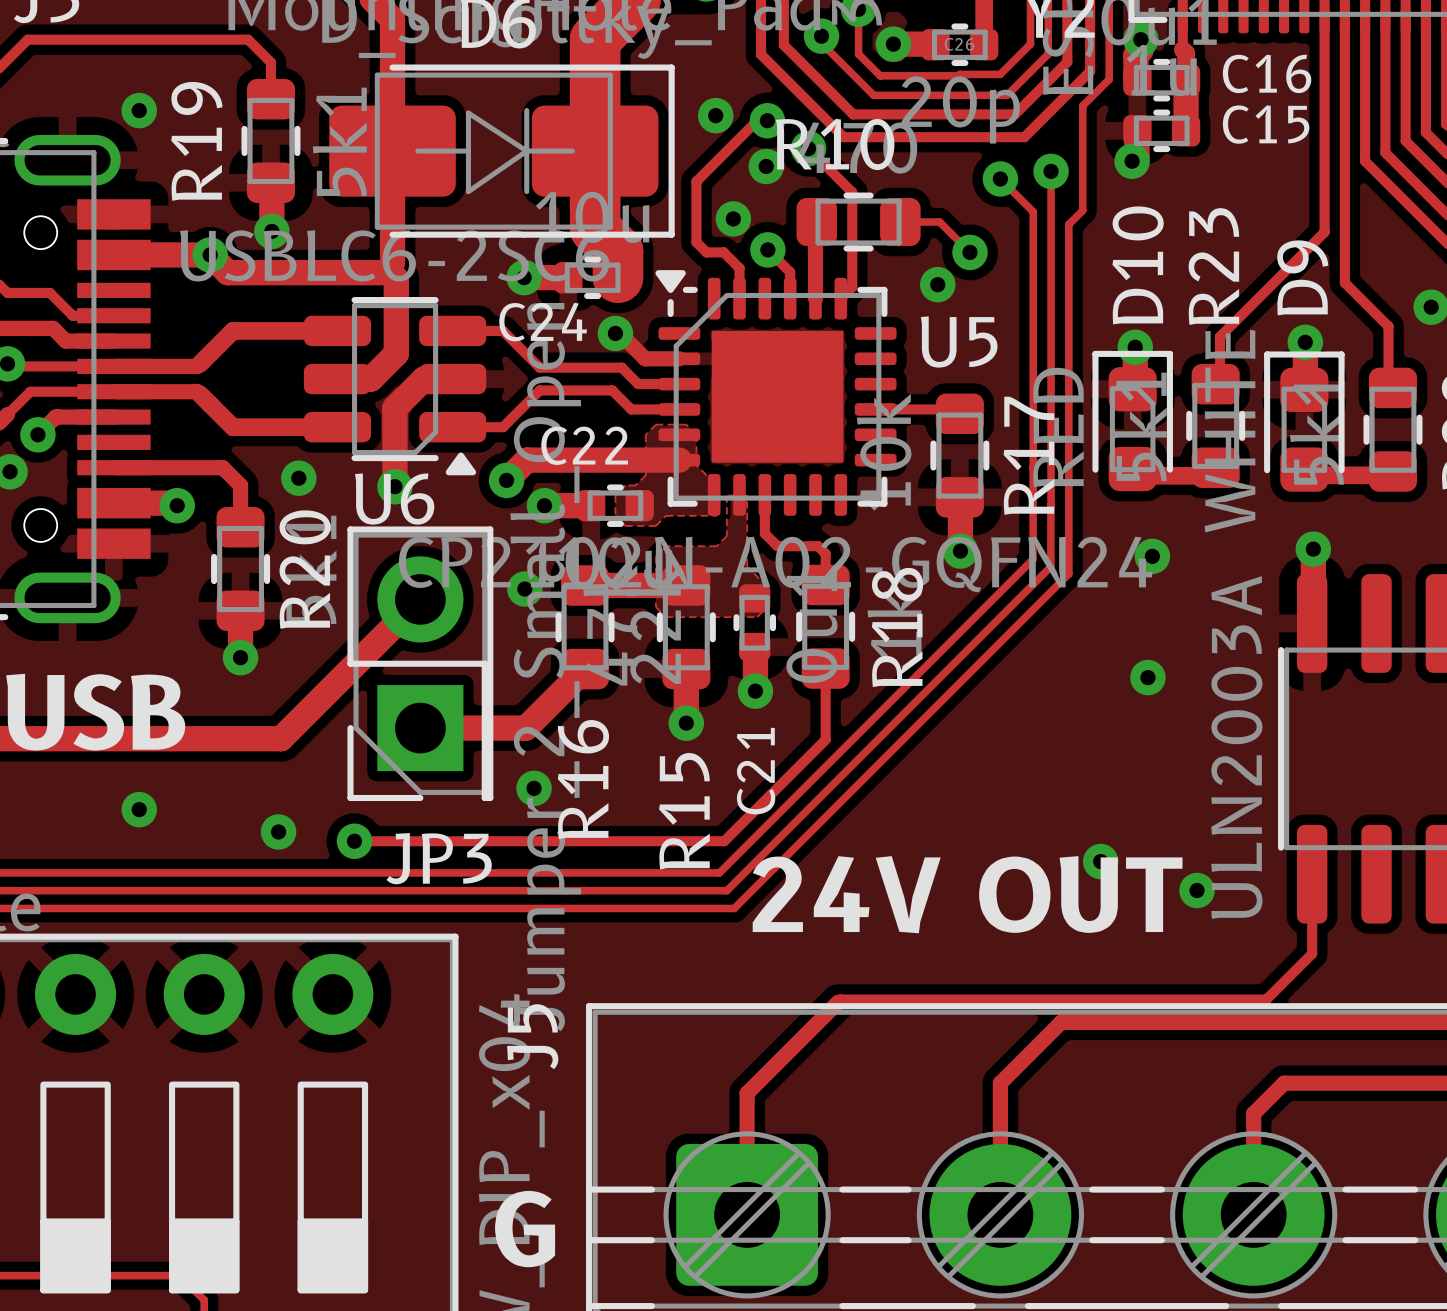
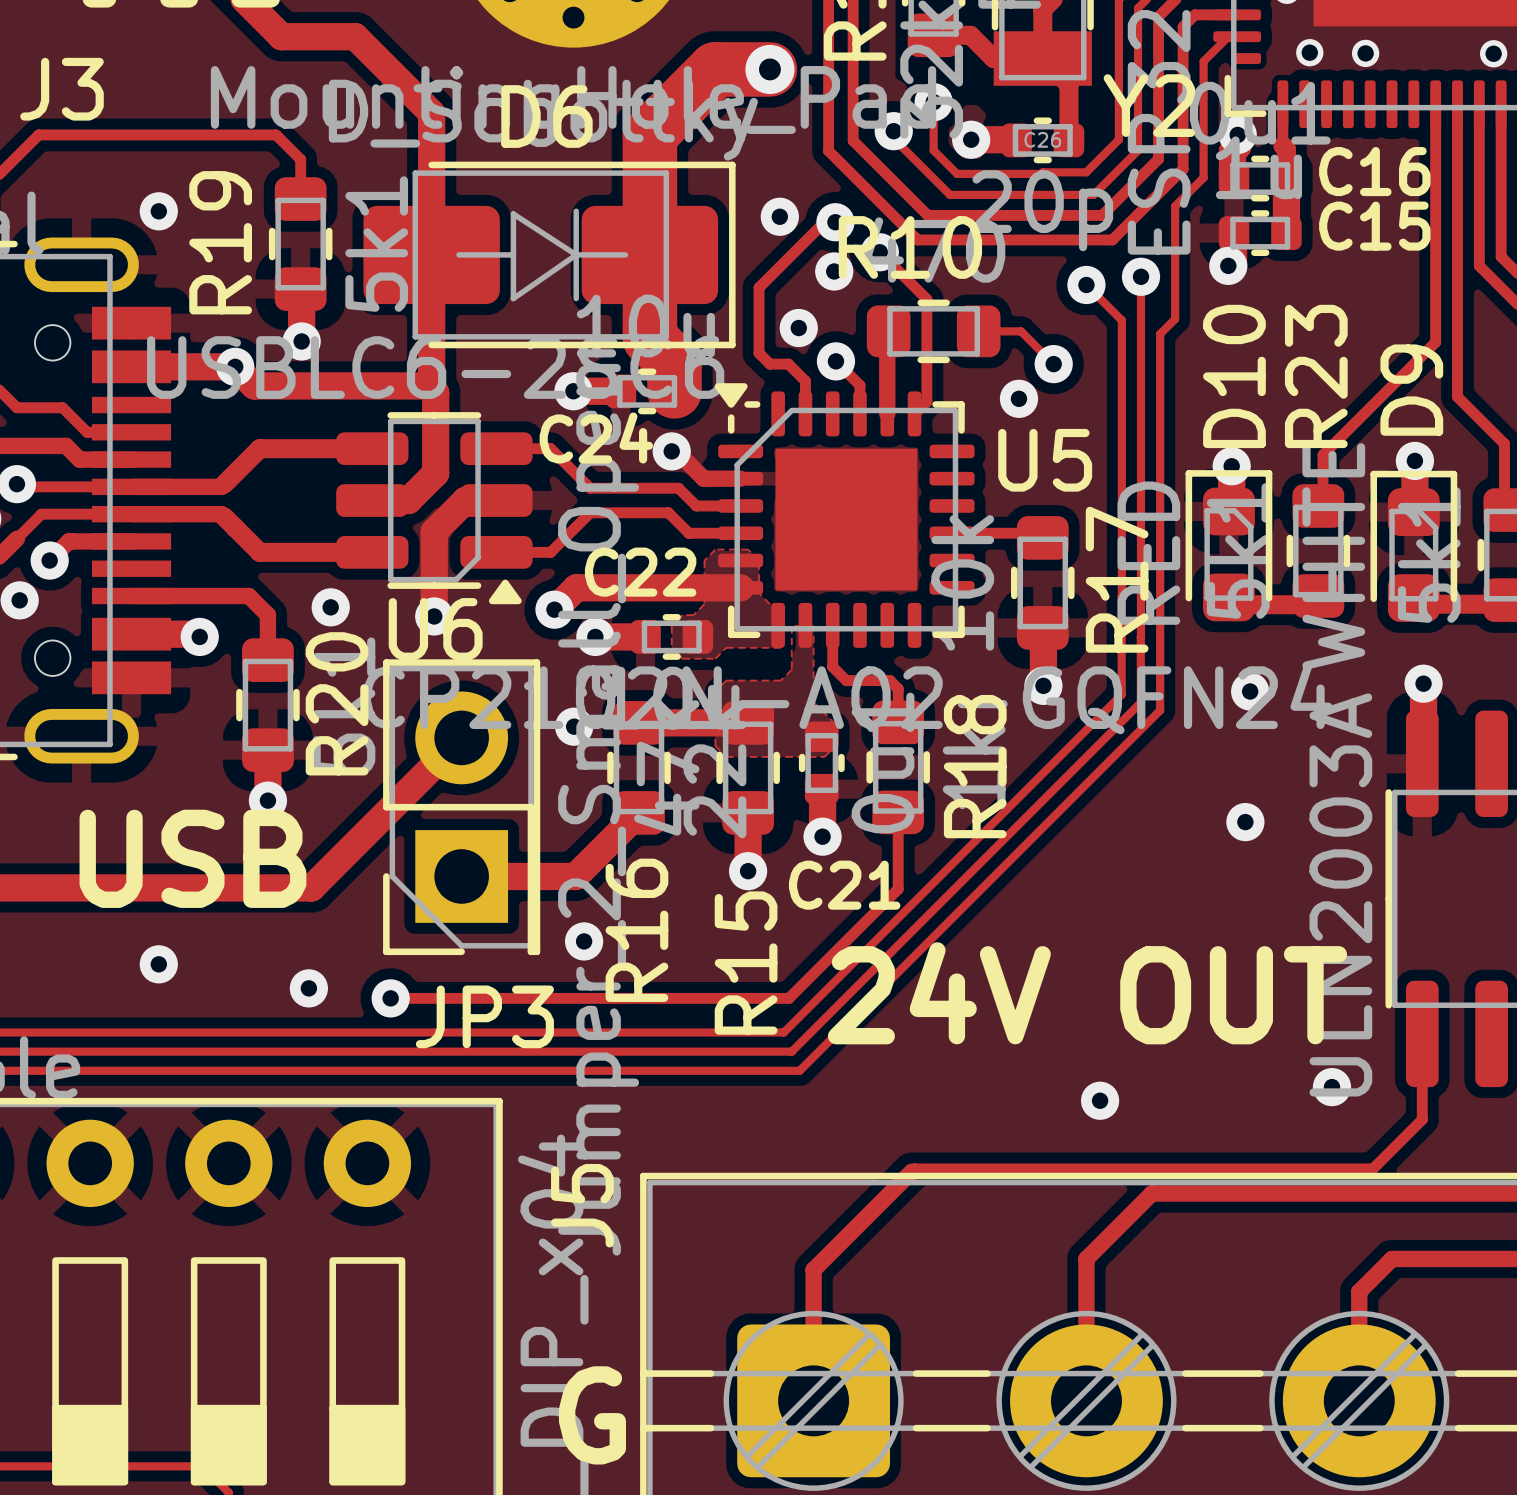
C21 name rotation: 0° (756, 771) -> 90° clockwise (844, 885)
via: (1100, 861) -> none
via position: (1197, 890) -> (1331, 1087)
text position: 24V OUT (967, 894) -> 24V OUT (1087, 993)
via: none -> (1100, 1100)

